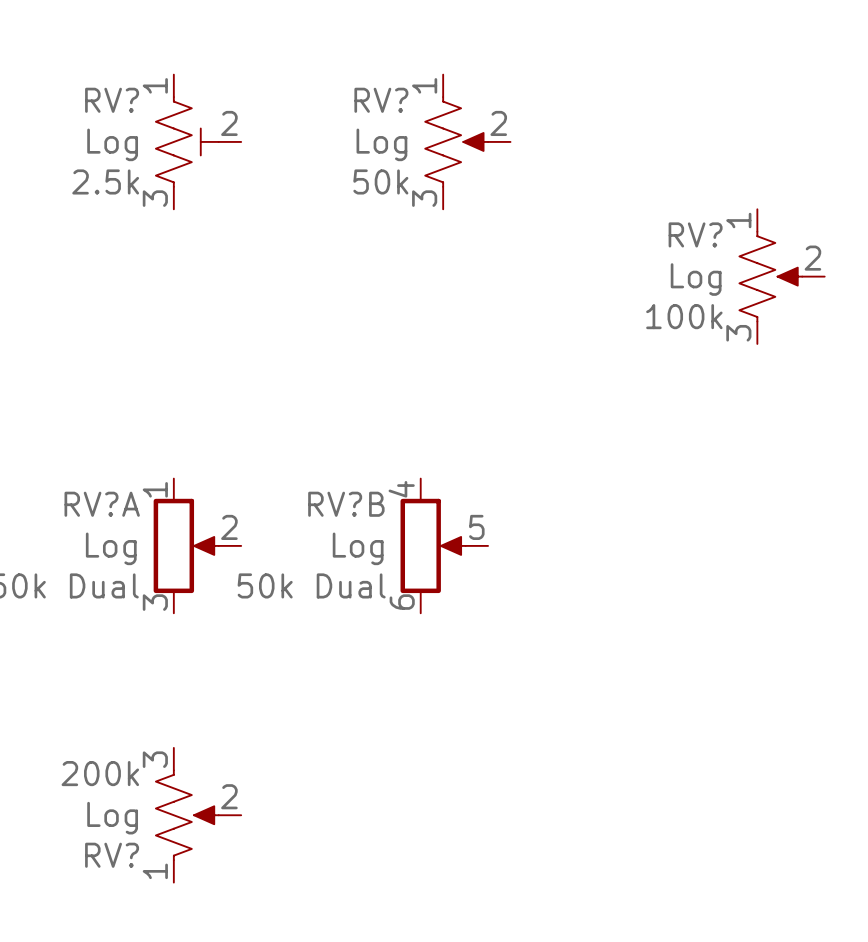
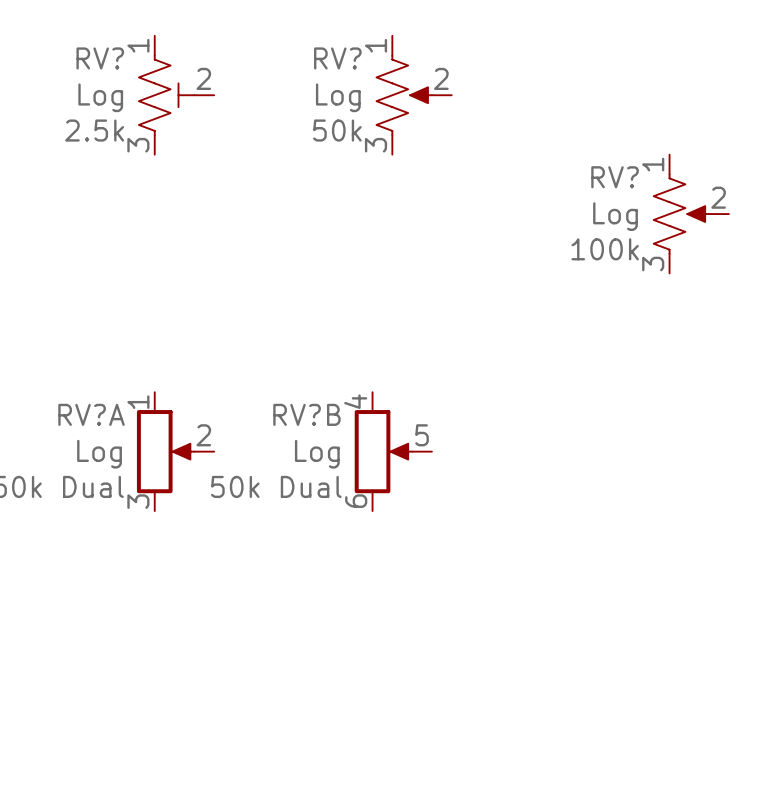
RV?: (198, 815) -> none

